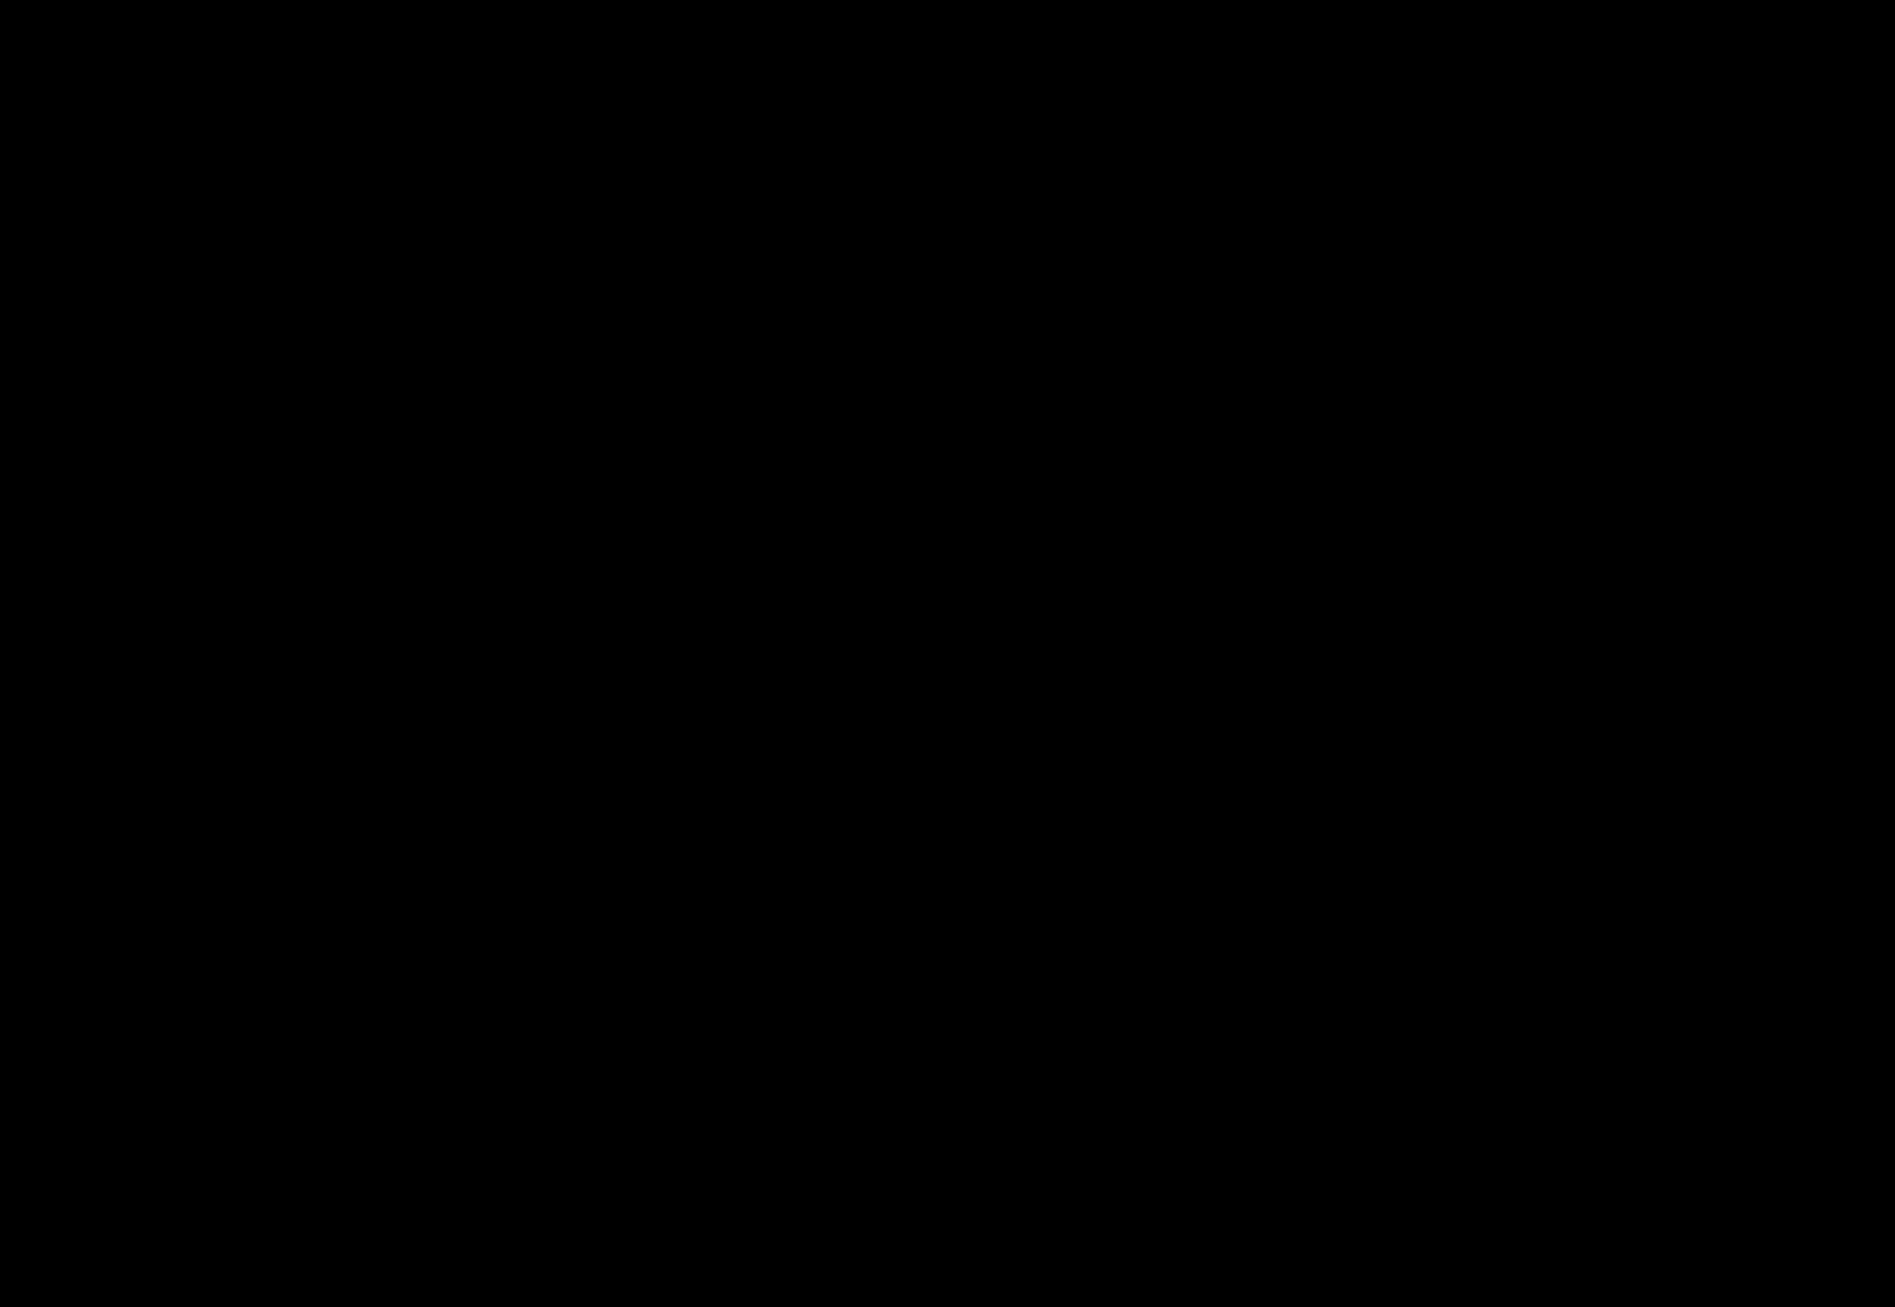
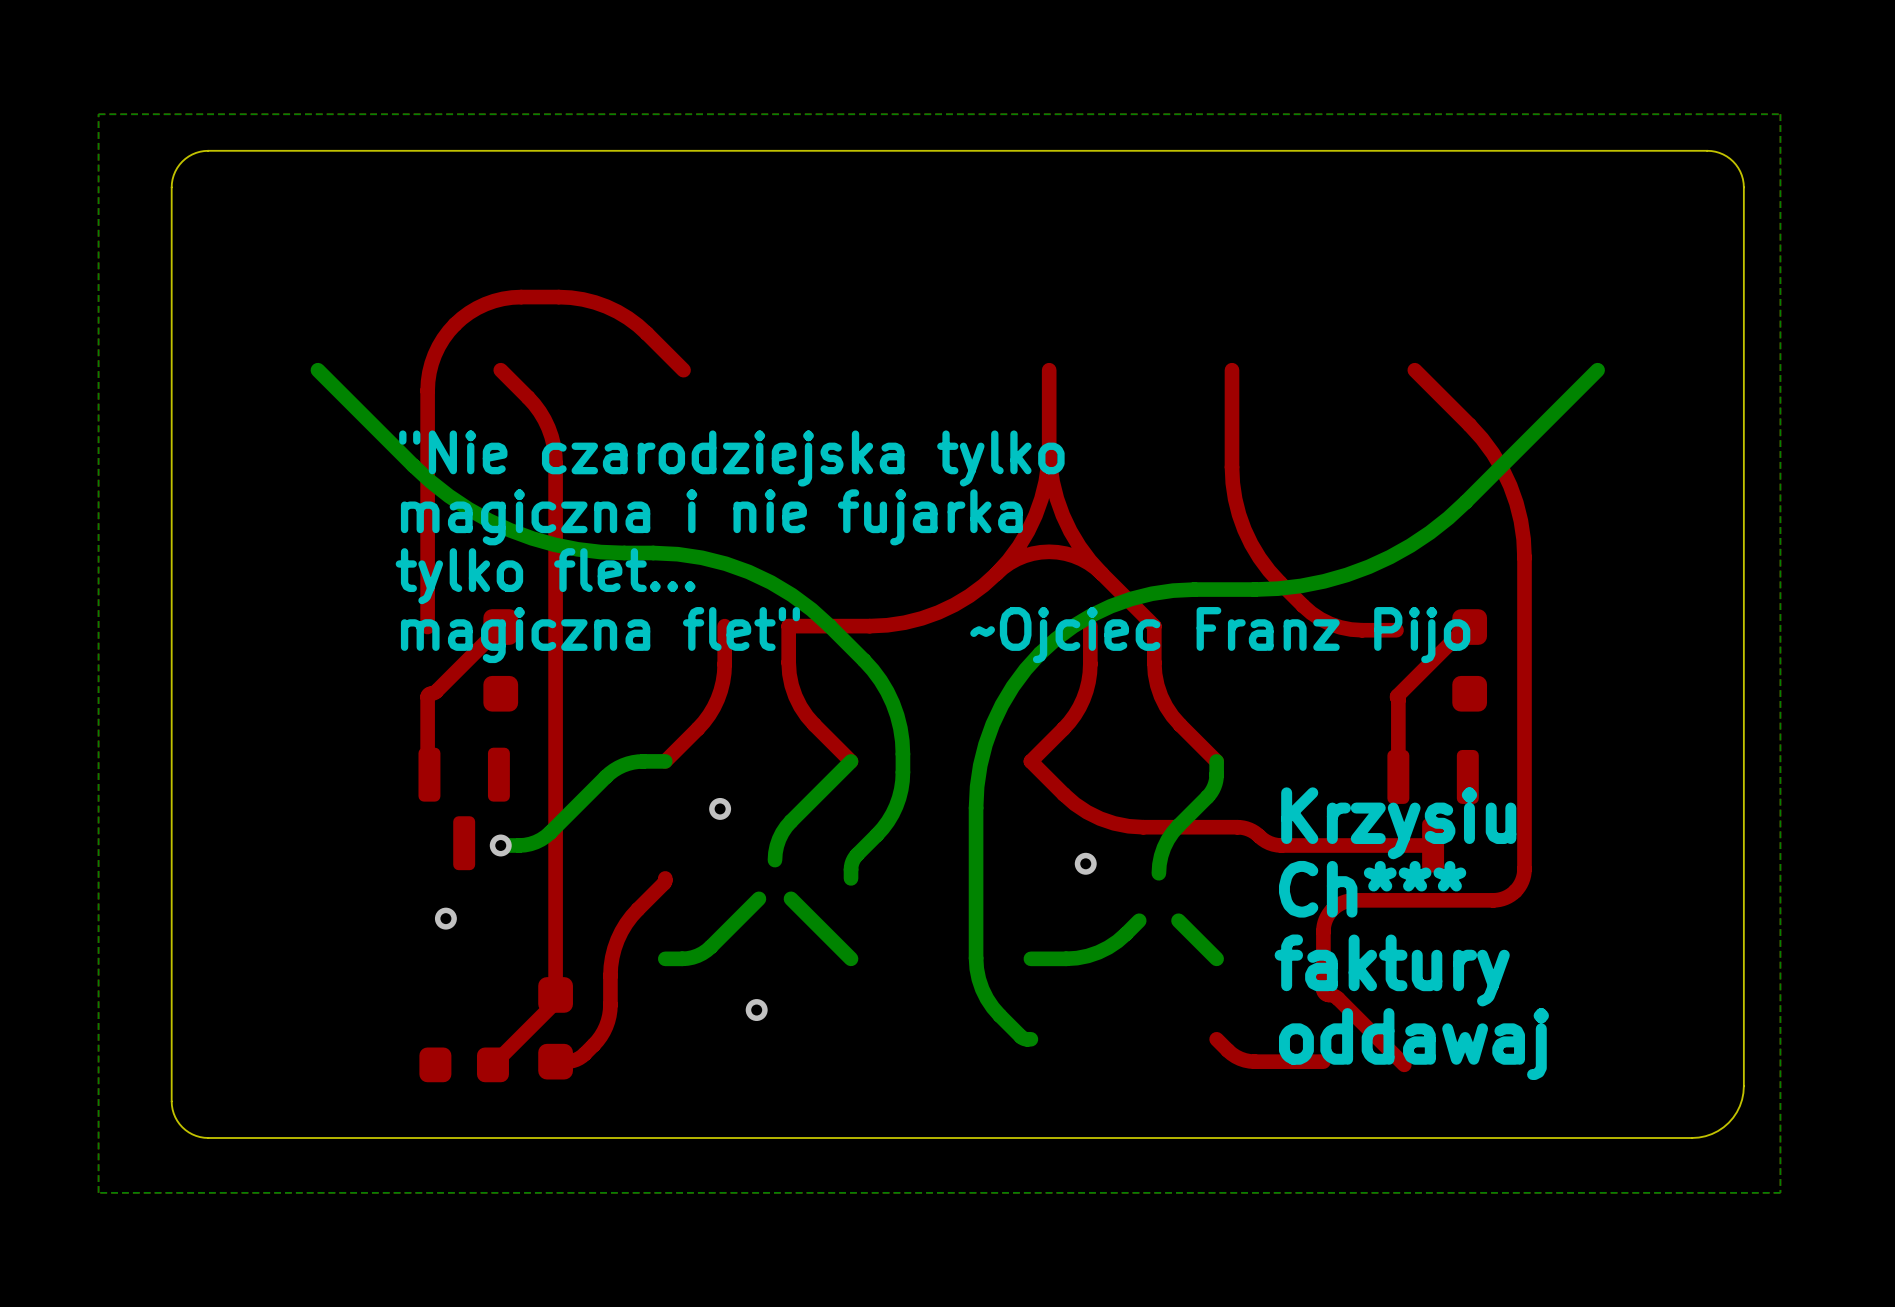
bottom zone outline: none -> (1780, 114) (1780, 1192) (98, 1192) (98, 114) (1780, 114)
board edge: none -> (1707, 150) (208, 150) (188, 156) (177, 167) (171, 187) (171, 1101) (177, 1120) (188, 1132) (208, 1137) (1692, 1137) (1705, 1136) (1718, 1131) (1728, 1122) (1736, 1112) (1742, 1099) (1743, 1086) (1743, 187) (1740, 171) (1733, 161) (1723, 154) (1707, 150)
bottom track: none -> (317, 370) (430, 481) (468, 509) (488, 520) (532, 538) (577, 549) (600, 552) (677, 554) (725, 563) (770, 582) (791, 595) (829, 626) (864, 660) (880, 680) (892, 703) (902, 741) (902, 780) (896, 806) (882, 828) (853, 859) (851, 878)
top track: none -> (500, 370) (539, 411) (548, 427) (555, 454) (555, 998) (553, 1004) (492, 1064)
top track: none -> (683, 370) (647, 333) (628, 318) (606, 306) (583, 299) (558, 297) (502, 298) (477, 308) (455, 324) (443, 338) (434, 354) (428, 381) (427, 627)
top track: none -> (1049, 370) (1049, 446)
top track: none -> (1232, 370) (1232, 483) (1239, 514) (1244, 529) (1259, 557) (1279, 582) (1303, 605) (1320, 619) (1351, 629) (1396, 630)
top track: none -> (1414, 370) (1469, 425) (1492, 453) (1510, 485) (1520, 520) (1524, 557) (1524, 869) (1522, 881) (1517, 888) (1508, 896) (1499, 899) (1351, 900) (1339, 904) (1328, 914) (1323, 928) (1324, 992) (1338, 998) (1404, 1064)
bottom track: none -> (1597, 370) (1448, 518) (1430, 532) (1390, 557) (1346, 574) (1301, 585) (1254, 589) (1173, 590) (1131, 598) (1091, 615) (1073, 626) (1040, 653) (1025, 669) (1001, 705) (985, 744) (980, 765) (976, 808) (976, 958) (978, 979) (992, 1007) (1021, 1037) (1030, 1039)
top track: none -> (1049, 446) (1045, 481) (1035, 515) (1018, 546) (996, 573)
top track: none -> (1049, 446) (1052, 481) (1062, 515) (1079, 546) (1101, 573)
text: none -> "Nie czarodziejska tylko (731, 458)
text: none -> magiczna i nie fujarka (711, 517)
top track: none -> (996, 573) (983, 585) (954, 604) (921, 618) (887, 625) (788, 626) (789, 674) (795, 696) (806, 716) (851, 761)
top track: none -> (1101, 573) (1154, 626) (1155, 674) (1161, 696) (1172, 716) (1216, 761)
top track: none -> (1101, 573) (1081, 559) (1065, 553) (1049, 551) (1032, 553) (1016, 559) (996, 573)
text: none -> tylko flet... (545, 576)
top track: none -> (724, 626) (724, 673) (717, 699) (703, 722) (665, 761)
top track: none -> (1090, 626) (1089, 673) (1083, 699) (1069, 722) (1030, 761) (1063, 794) (1087, 812) (1114, 823) (1128, 826) (1243, 827) (1254, 832) (1265, 841) (1277, 845) (1433, 845)
top track: none -> (500, 627) (436, 691) (427, 695) (427, 771) (429, 774)
top track: none -> (1469, 627) (1465, 628) (1397, 696) (1398, 776)
text: none -> magiczna flet" ~Ojciec Franz Pijo (935, 635)
part: none -> (500, 660)
part: none -> (1469, 660)
bottom track: none -> (665, 761) (638, 761) (618, 767) (605, 776) (541, 839) (524, 845) (500, 845)
bottom track: none -> (851, 761) (786, 826) (776, 845) (774, 860)
bottom track: none -> (1216, 761) (1216, 777) (1212, 789) (1167, 839) (1161, 855) (1158, 873)
part: none -> (464, 808)
via: none -> (720, 808)
part: none -> (1433, 811)
text: none -> Krzysiu (1398, 823)
via: none -> (500, 845)
via: none -> (1085, 863)
top track: none -> (665, 878) (664, 883) (631, 916) (617, 939) (610, 966) (609, 1015) (603, 1031) (593, 1044) (579, 1058) (569, 1061) (555, 1061)
text: none -> Ch*** (1372, 889)
bottom track: none -> (758, 898) (702, 953) (687, 958) (665, 958)
bottom track: none -> (791, 898) (851, 958)
via: none -> (445, 918)
bottom track: none -> (1139, 920) (1117, 941) (1098, 952) (1077, 958) (1030, 958)
bottom track: none -> (1178, 920) (1216, 958)
text: none -> faktury (1392, 970)
via: none -> (756, 1010)
part: none -> (555, 1028)
top track: none -> (1216, 1039) (1231, 1053) (1244, 1060) (1323, 1061)
text: none -> oddawaj (1413, 1044)
part: none -> (464, 1064)

